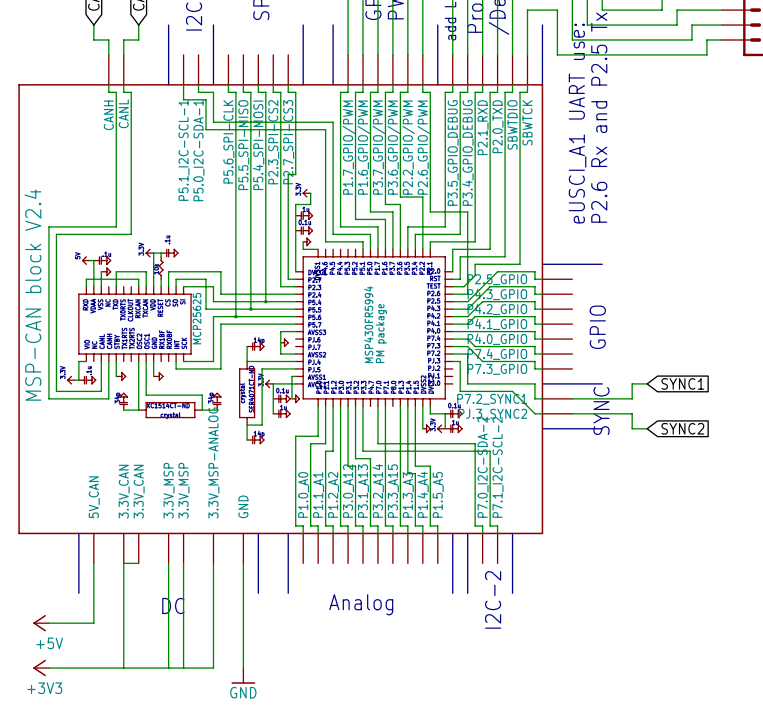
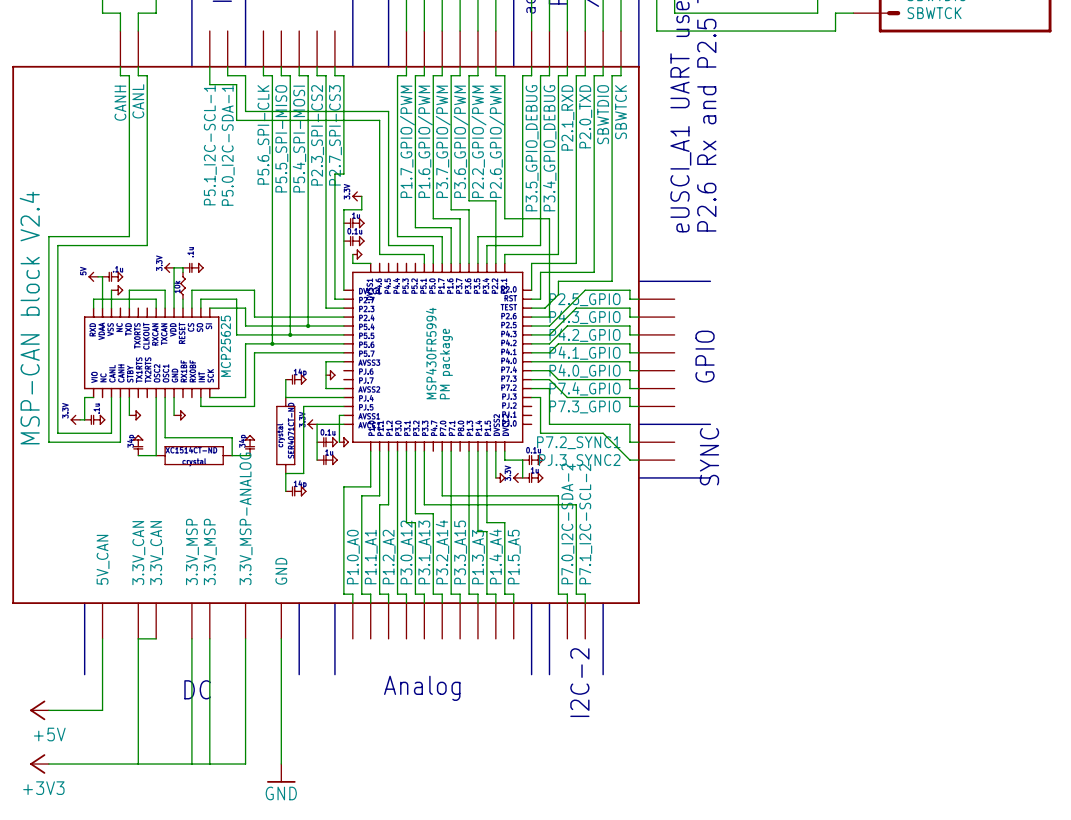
wire: (647, 383) (632, 383) (632, 398) (572, 398) -> none
global label: SYNC1 (682, 383) -> none
wire: (572, 413) (632, 413) (632, 428) (647, 428) -> none
global label: SYNC2 (682, 428) -> none

